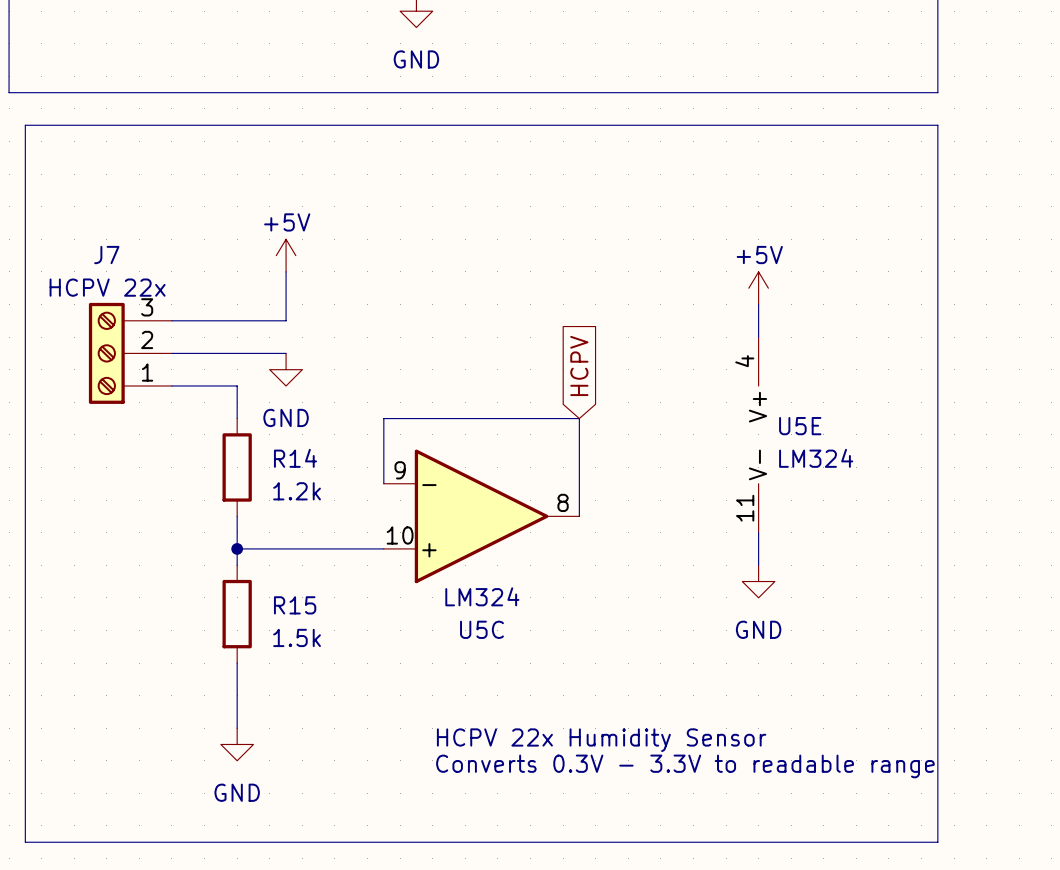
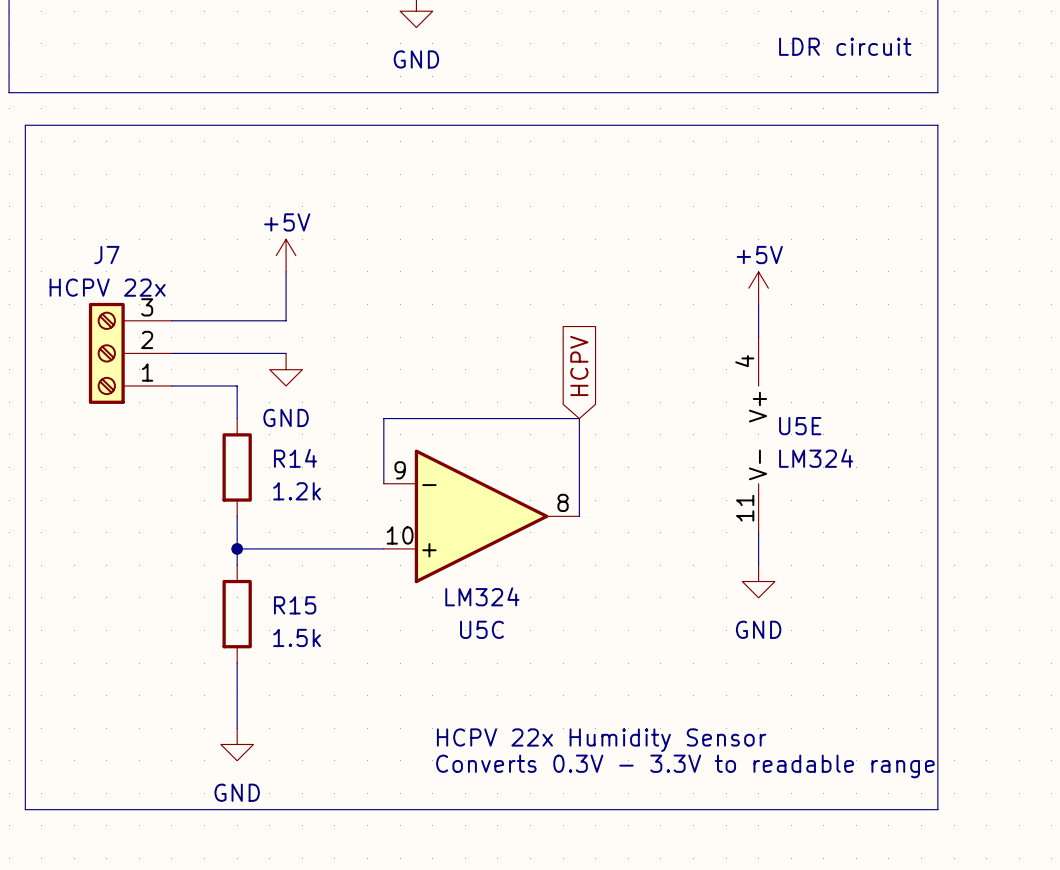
text: none -> LDR circuit (845, 46)
line: (25, 809) (25, 842) (937, 842) (937, 809) -> (25, 809) (937, 809)

